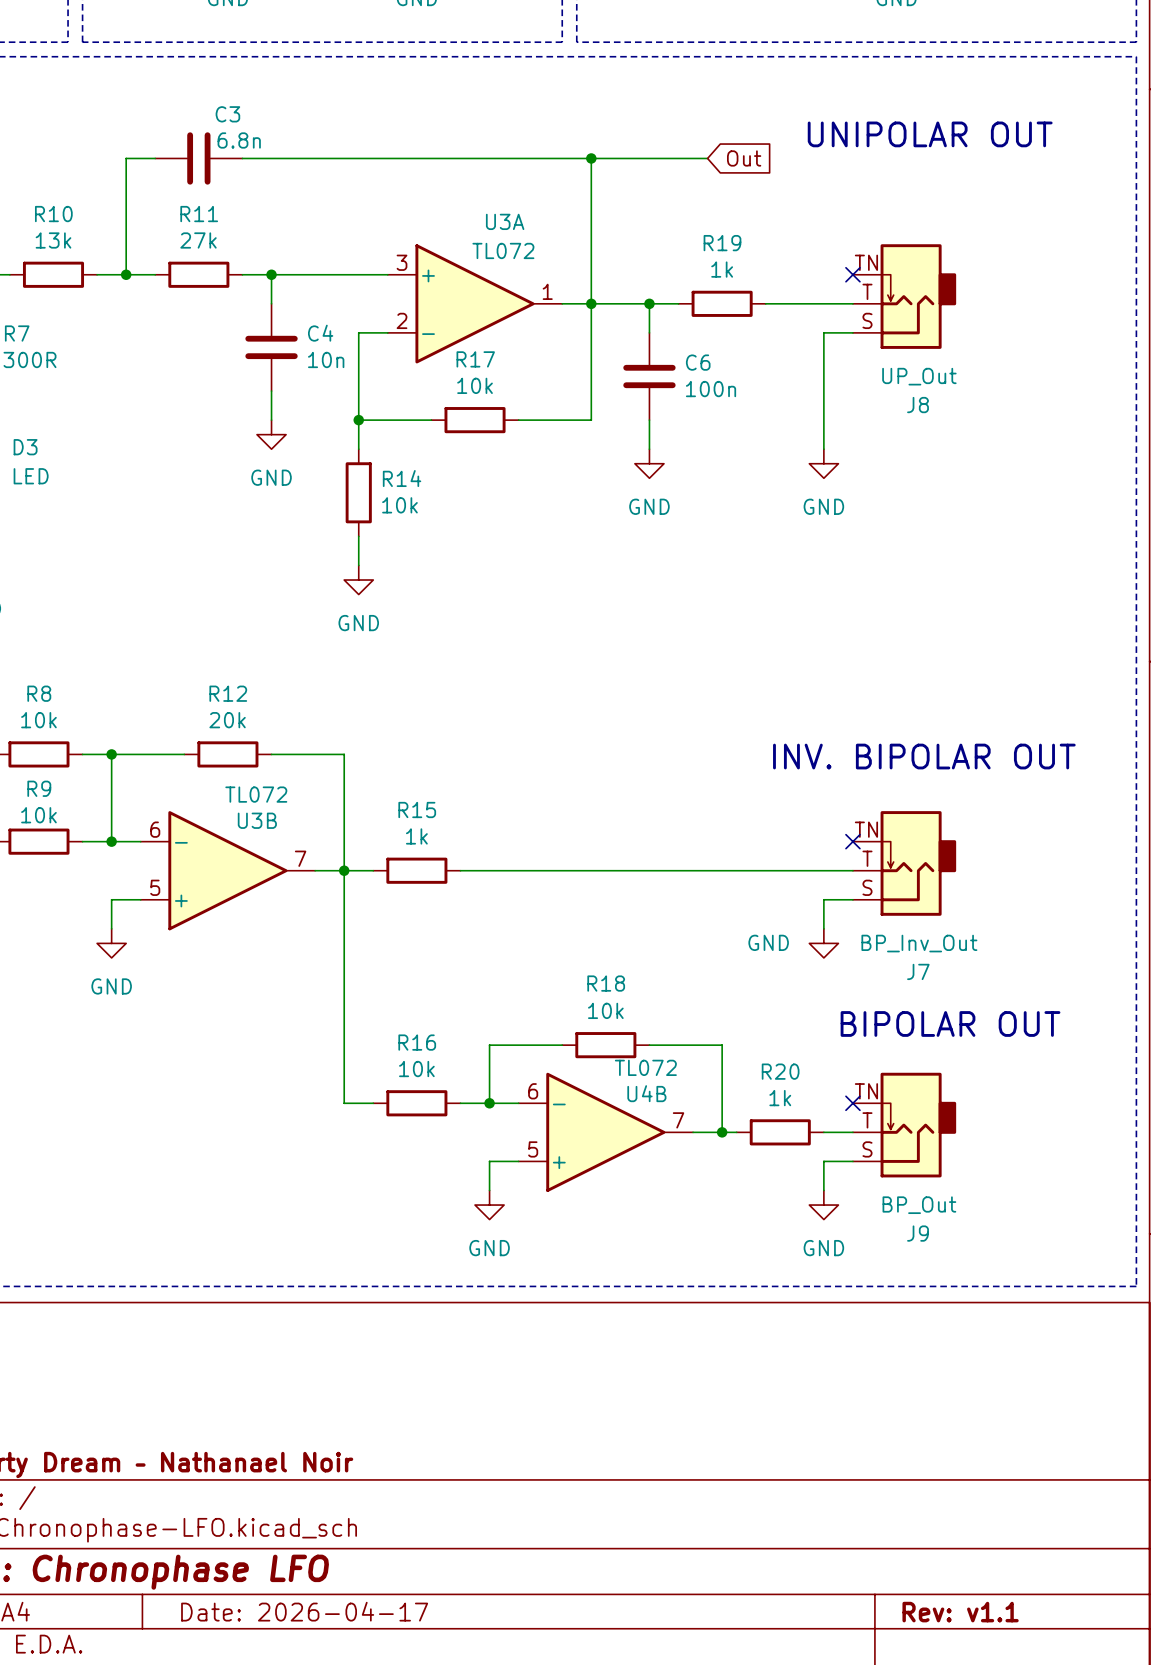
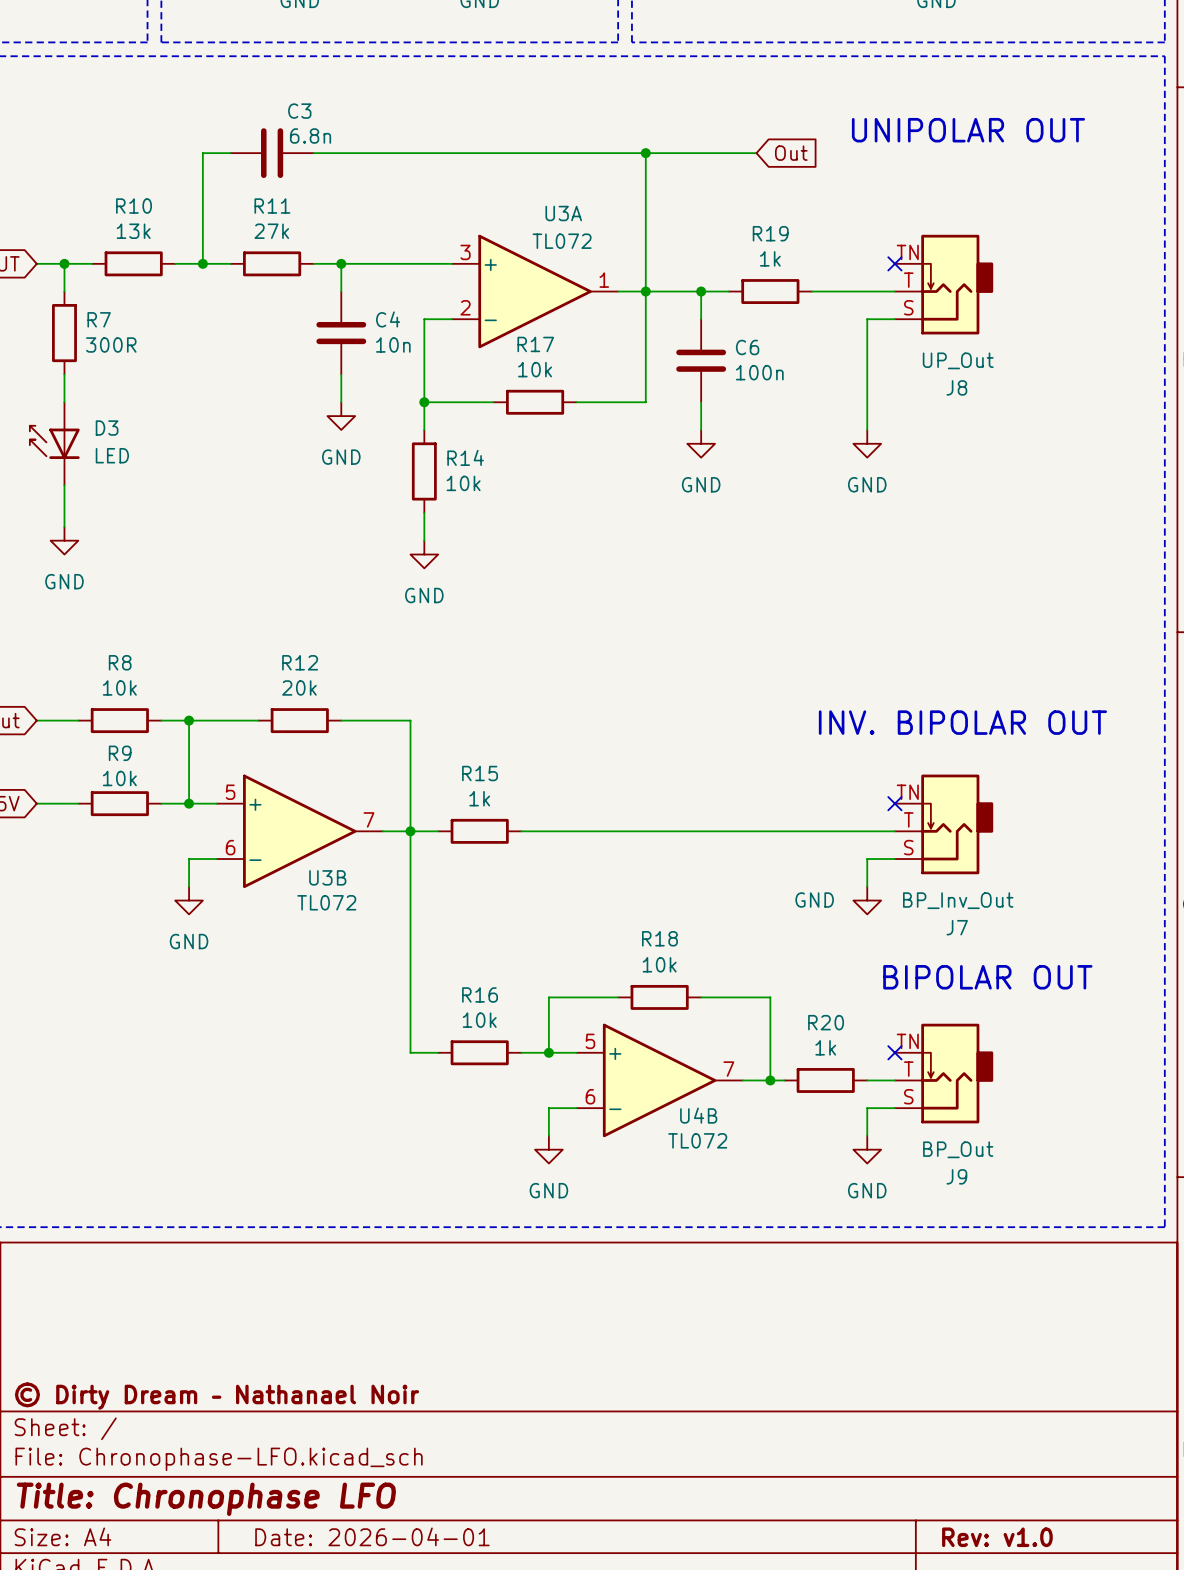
U3B flip: as is (227, 870) -> up-down (299, 831)
U4B flip: as is (605, 1132) -> up-down (659, 1080)
title block: Date: 2026-04-17 (304, 1611) -> Date: 2026-04-01 (372, 1536)
title block: Rev: v1.1 (960, 1612) -> Rev: v1.0 (997, 1537)

